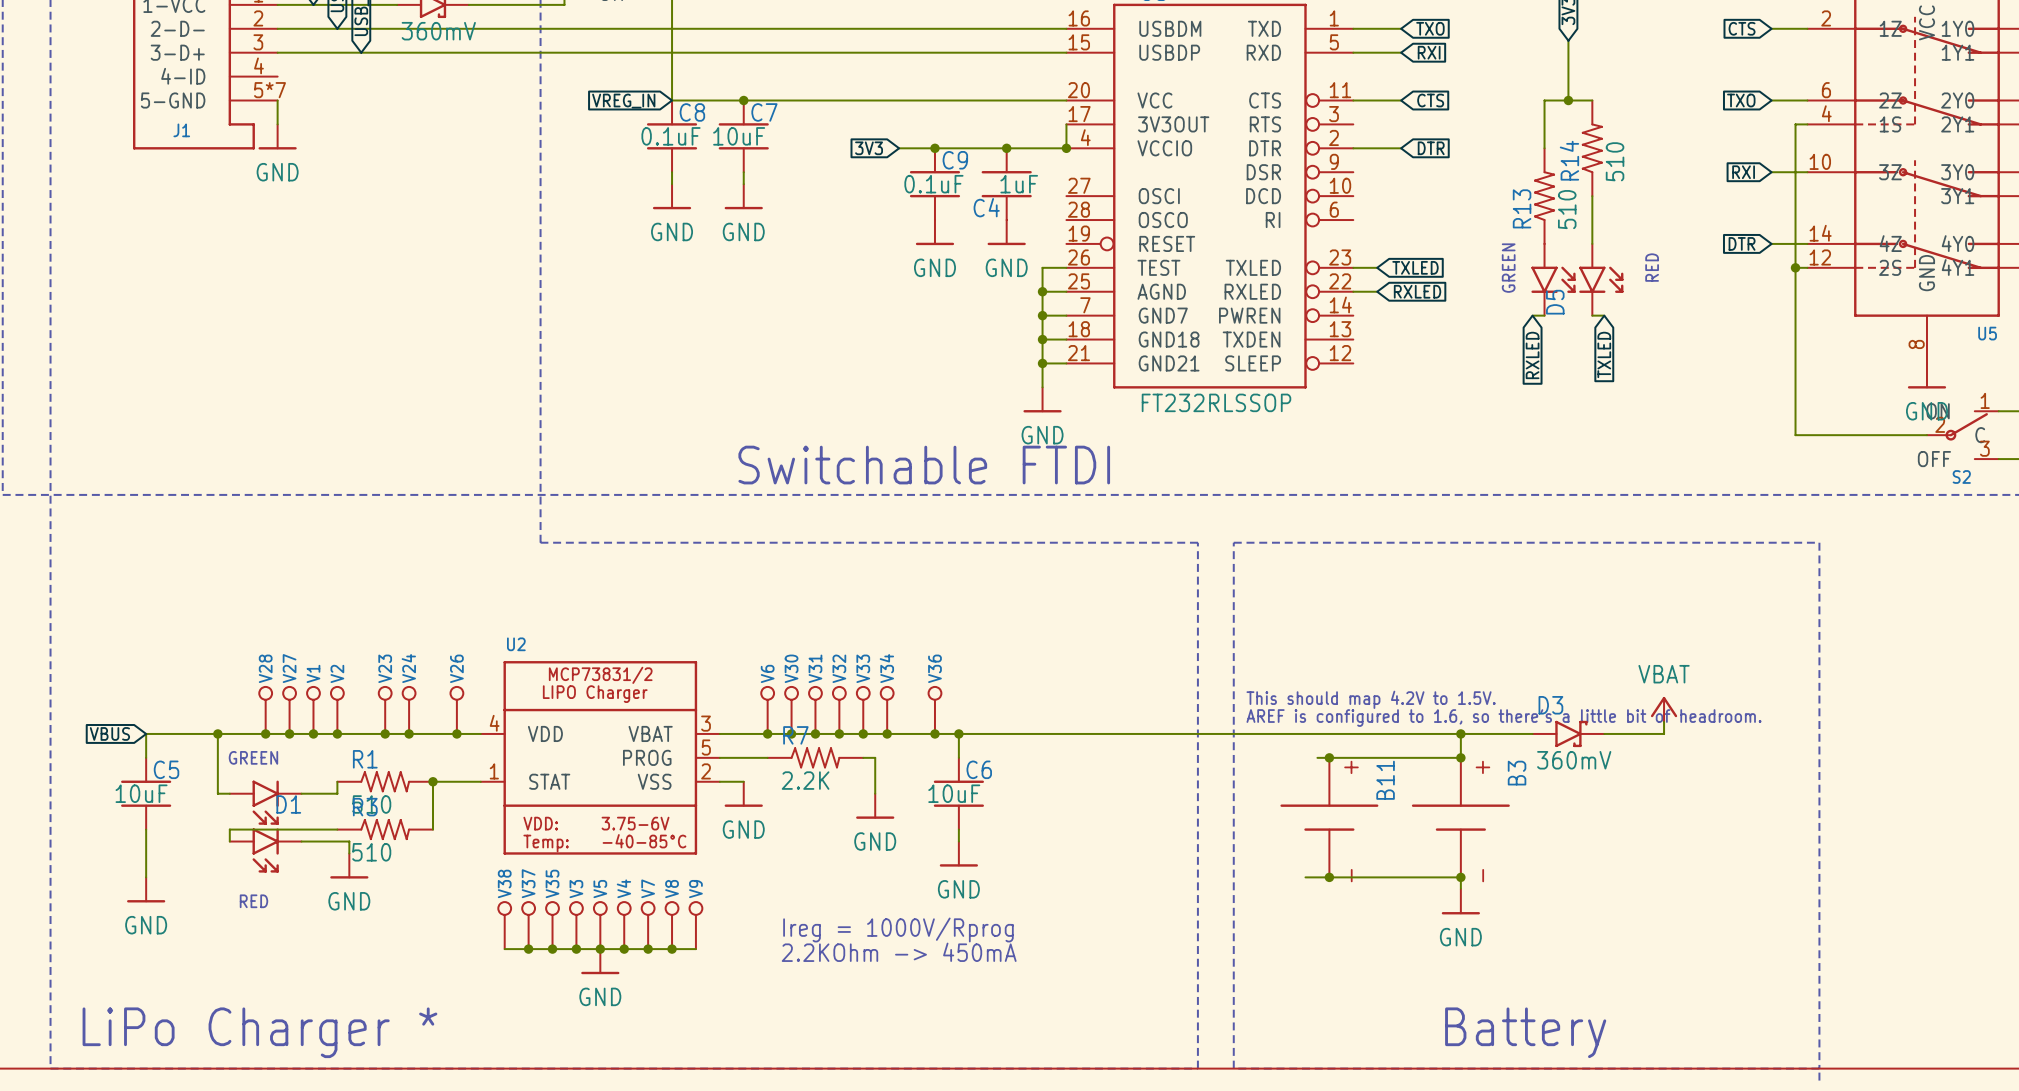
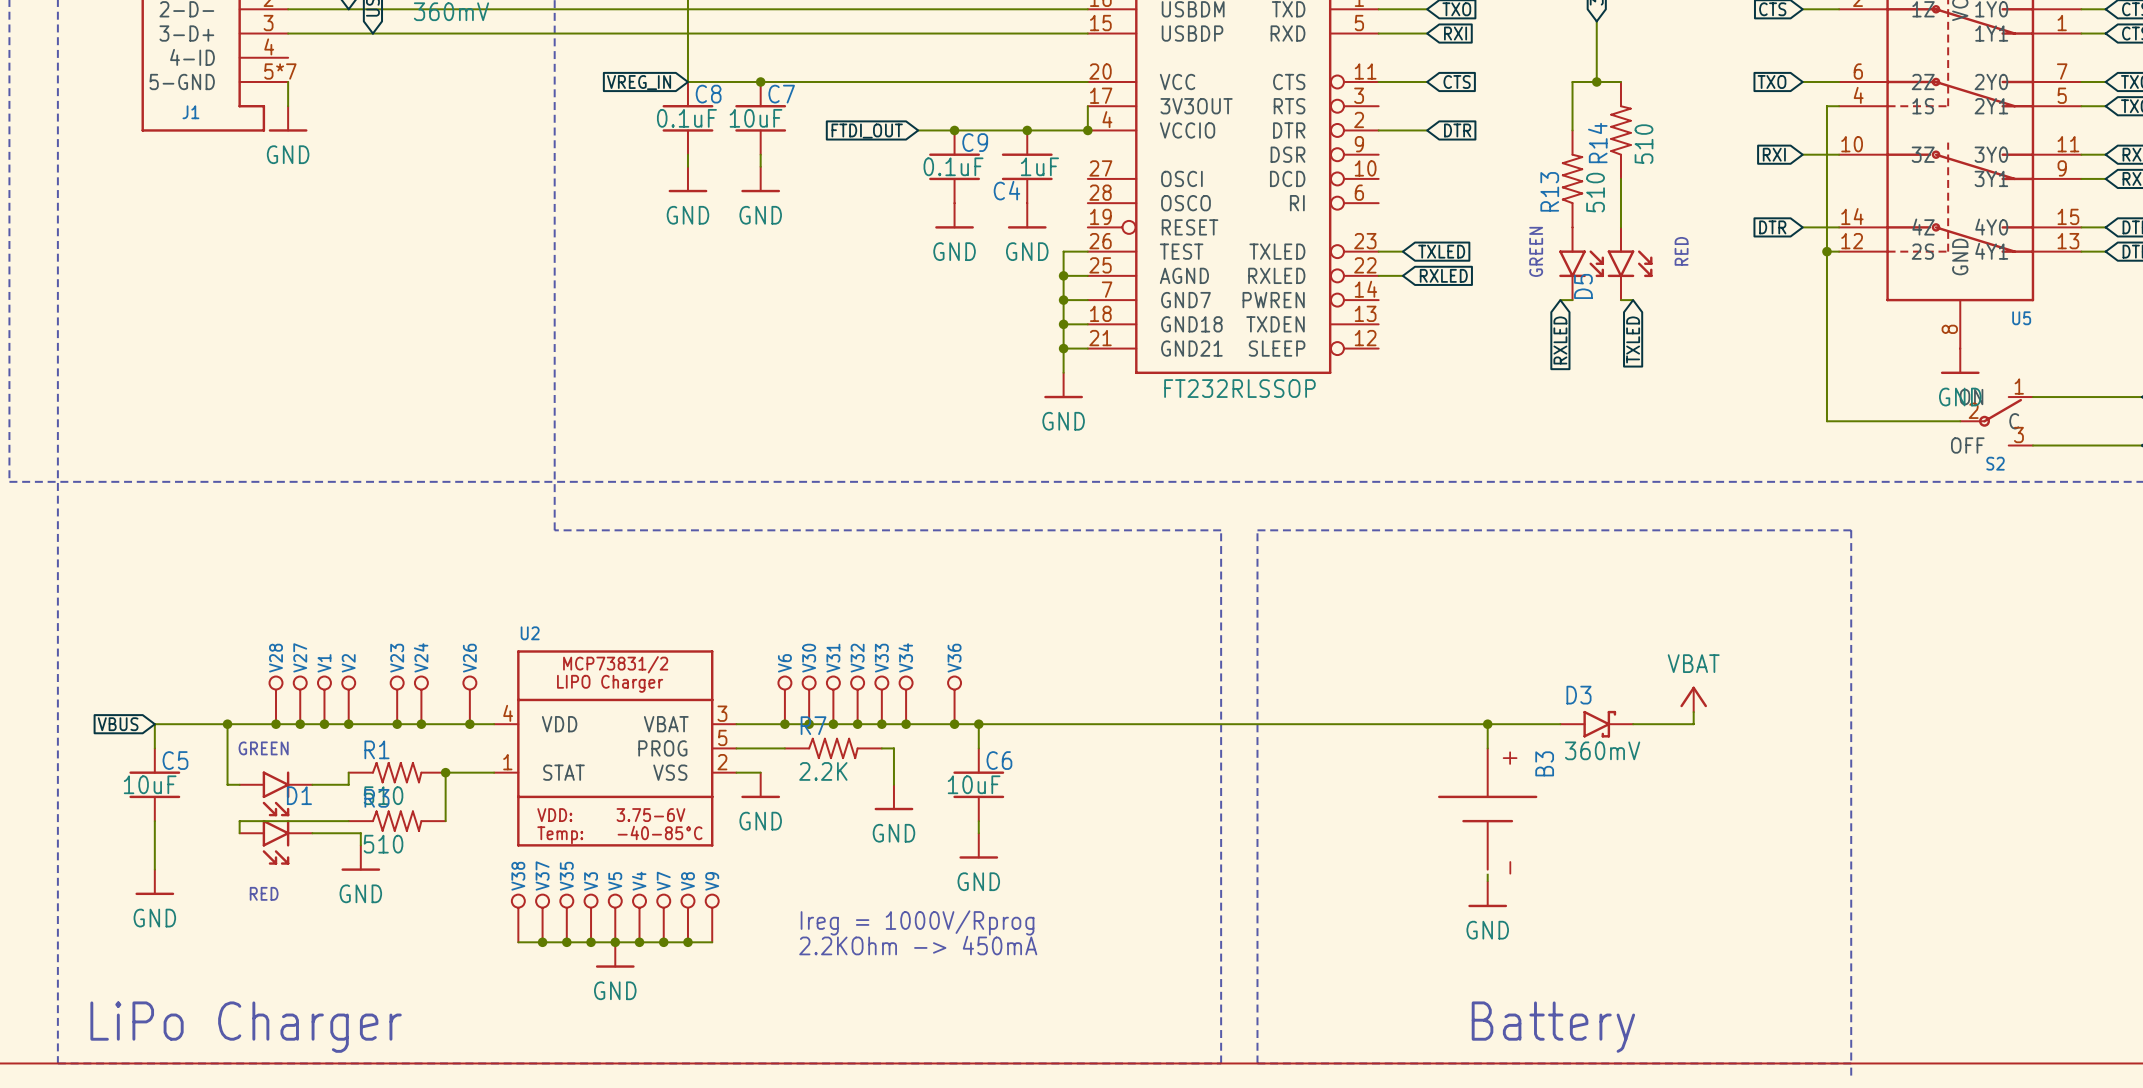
global label: 3V3 (869, 148) -> FTDI_OUT (867, 131)
text: Switchable FTDI (924, 465) -> none
text: This should map 4.2V to 1.5V. (1371, 699) -> none
text: AREF is configured to 1.6, so there's a little bit of headroom. (1504, 718) -> none
wire: (1317, 757) (1460, 757) -> none
junction: (1329, 757) -> none
junction: (1460, 757) -> none
B11: (1329, 817) -> none
wire: (1305, 877) (1460, 877) -> none
junction: (1329, 877) -> none
junction: (1460, 877) -> none
text: LiPo Charger * (259, 1032) -> LiPo Charger (246, 1027)

